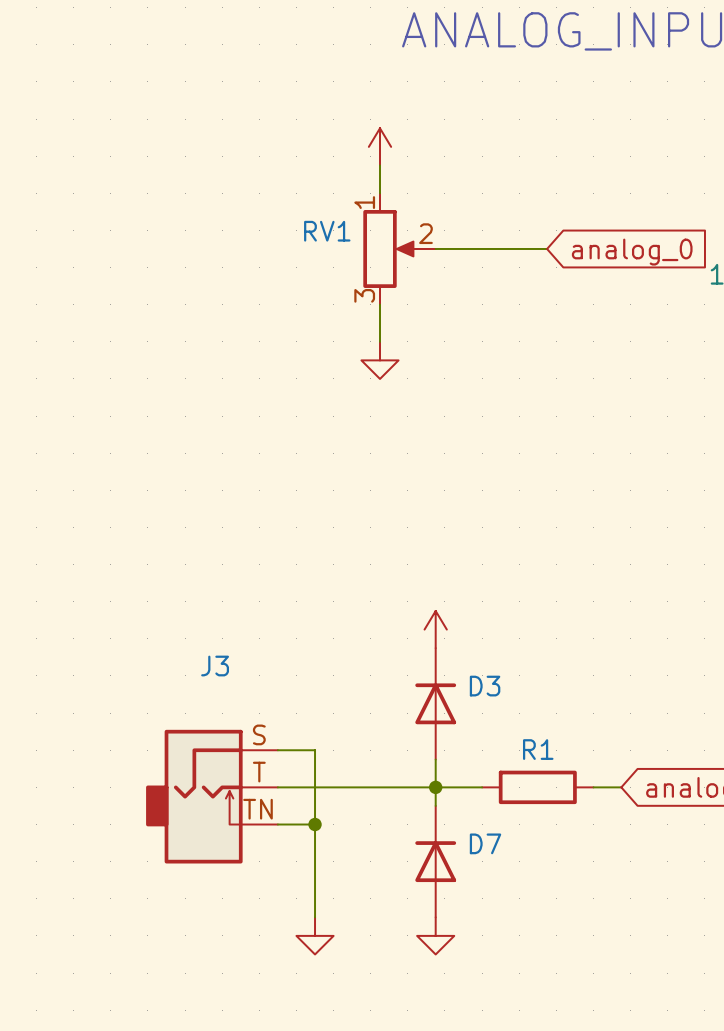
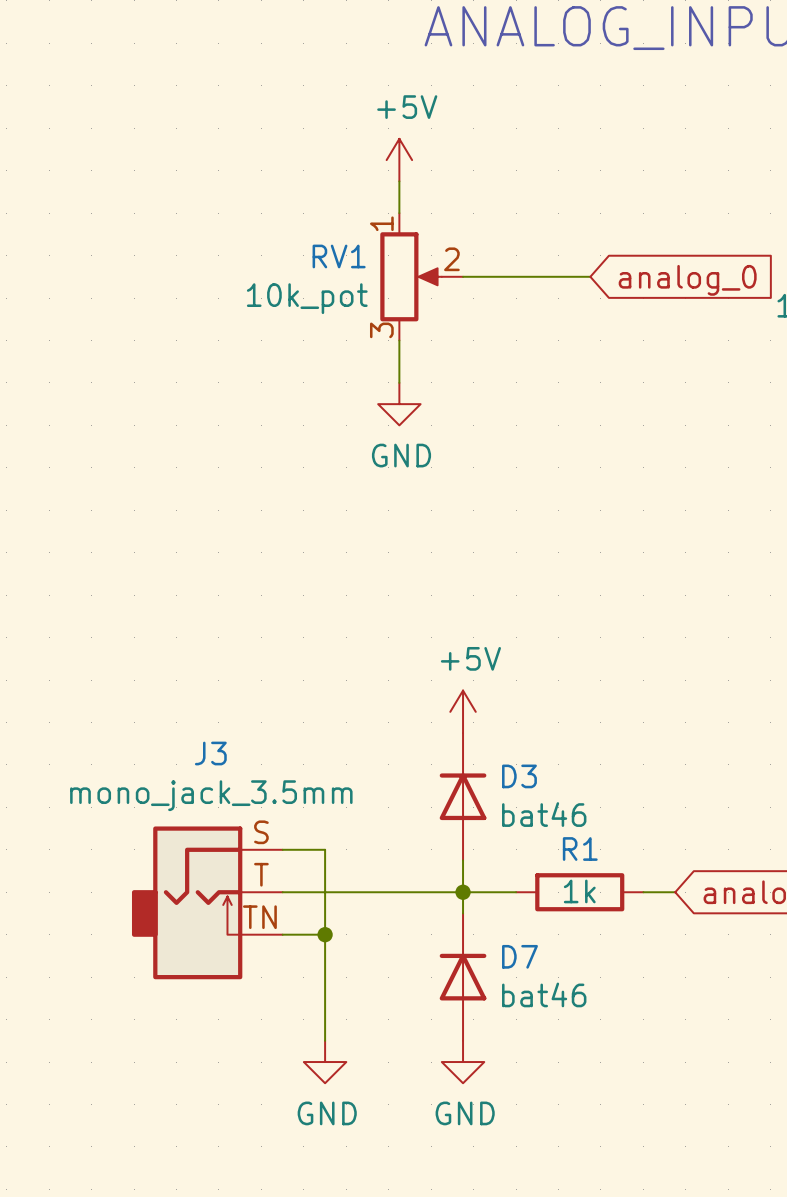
power symbol text: none -> +5V (407, 107)
RV1 value: none -> 10k_pot (307, 298)
power symbol text: none -> GND (401, 455)
power symbol text: none -> +5V (470, 658)
J3 value: none -> mono_jack_3.5mm (211, 795)
D3 value: none -> bat46 (544, 814)
R1 value: none -> 1k (579, 891)
D7 value: none -> bat46 (544, 994)
power symbol text: none -> GND (327, 1113)
power symbol text: none -> GND (465, 1113)

